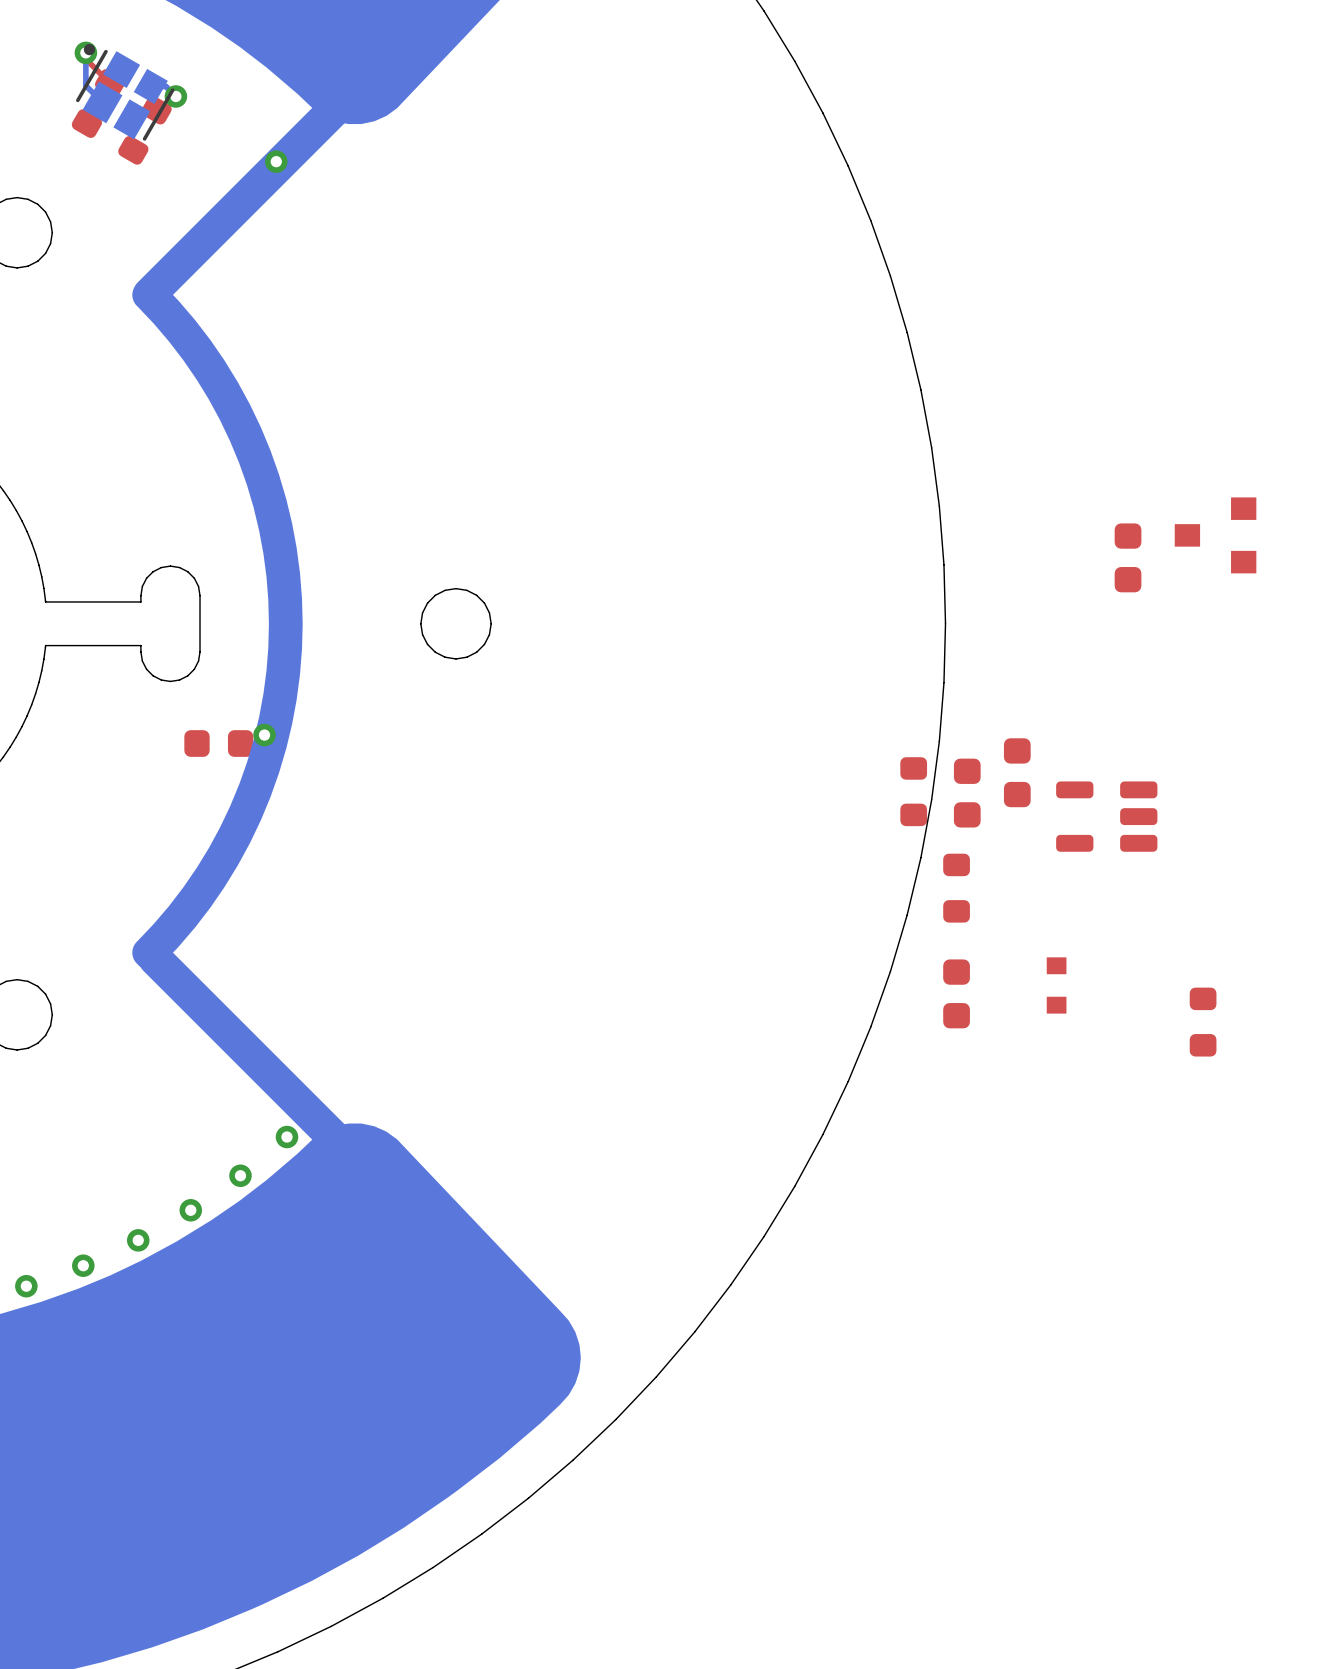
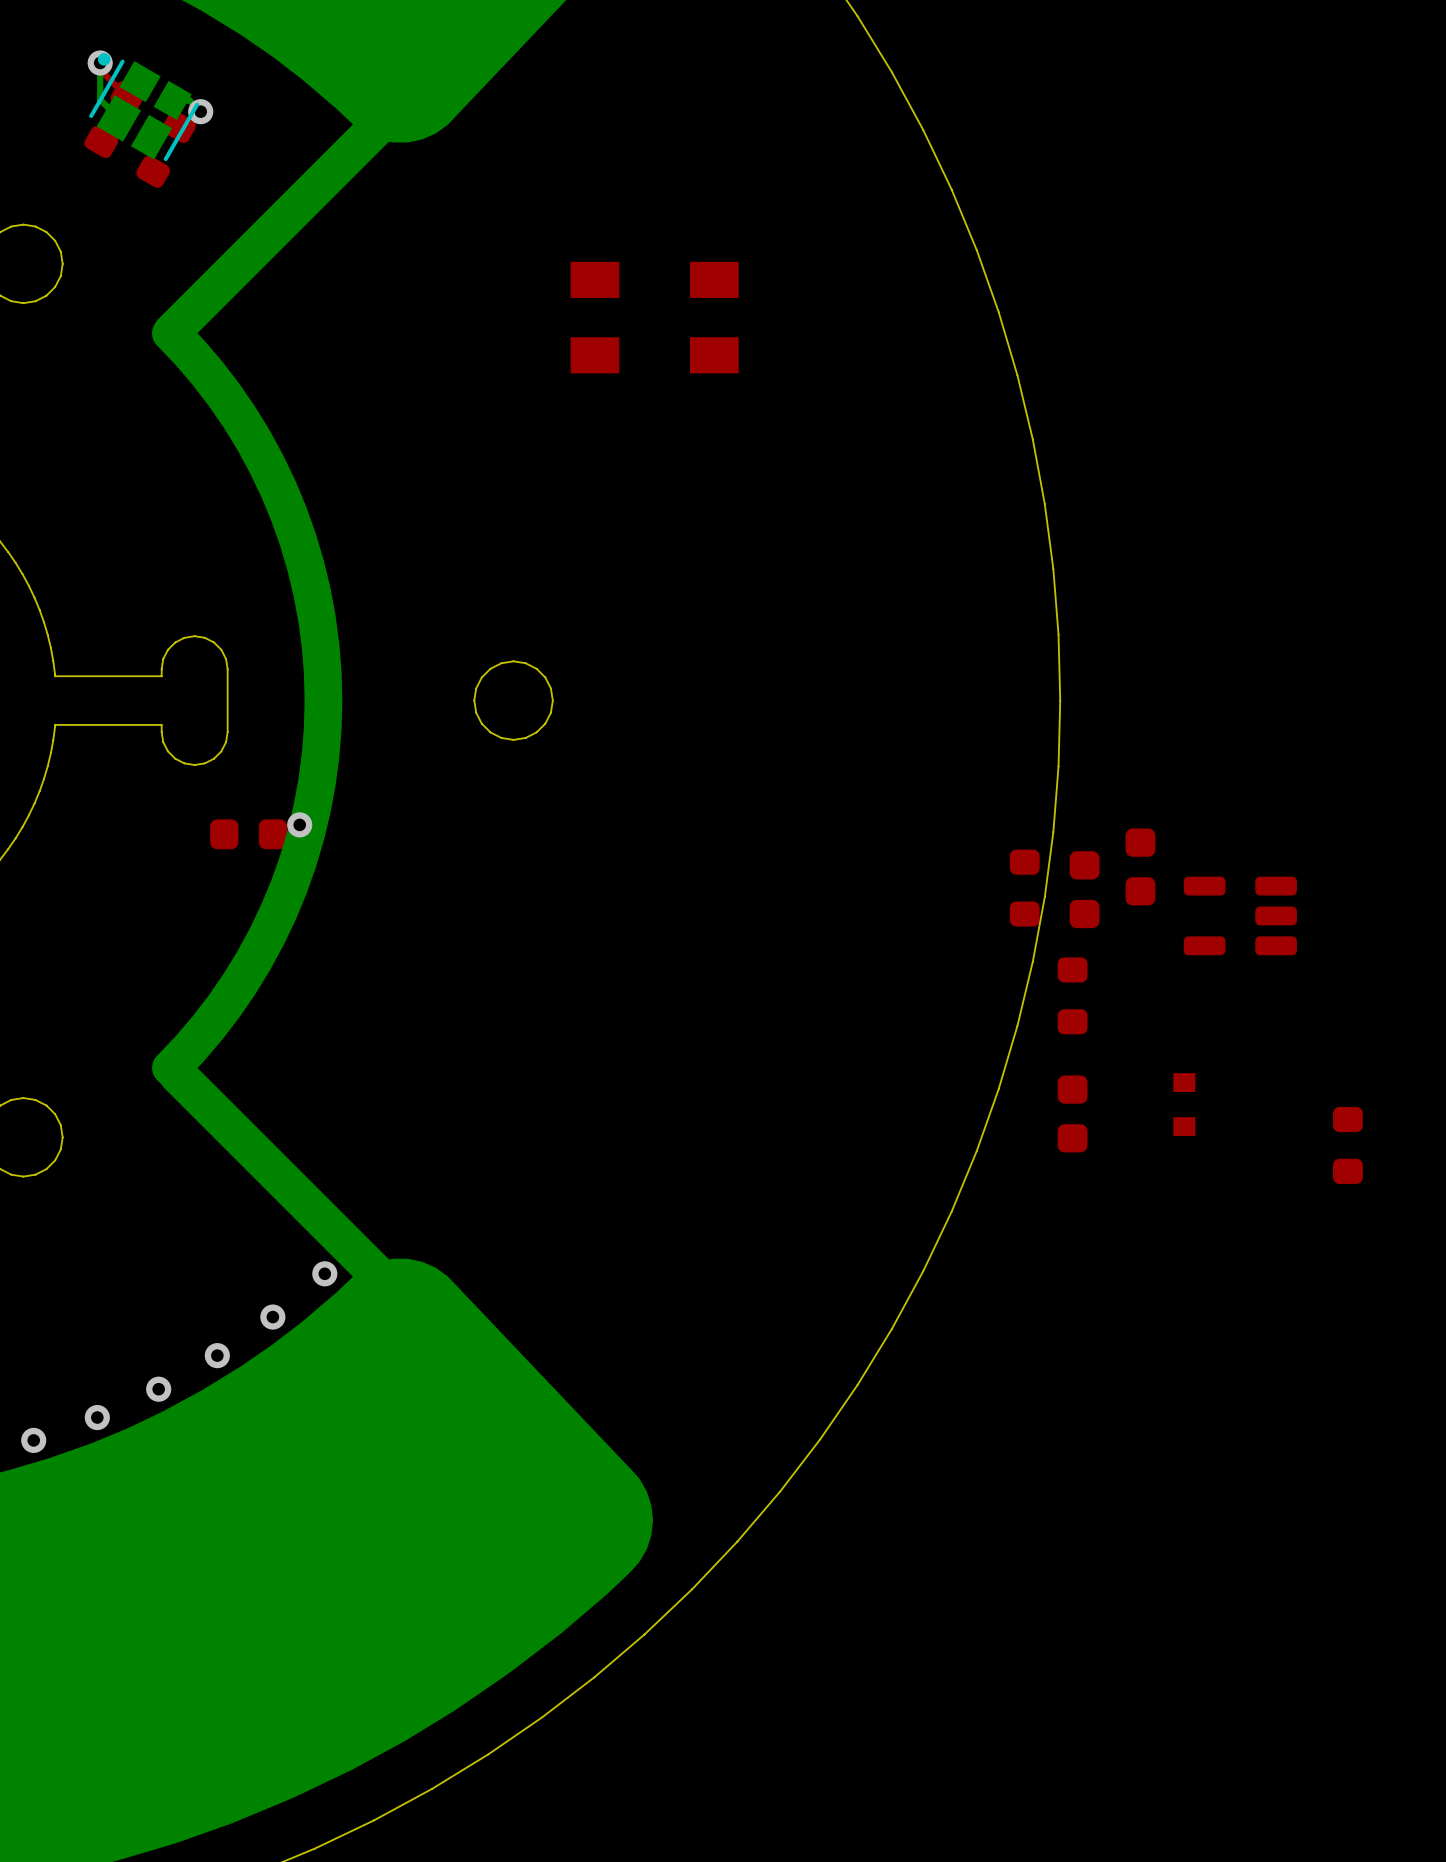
via: (276, 161) -> none
part: none -> (654, 317)
part: (1215, 535) -> none
part: (1128, 557) -> none

